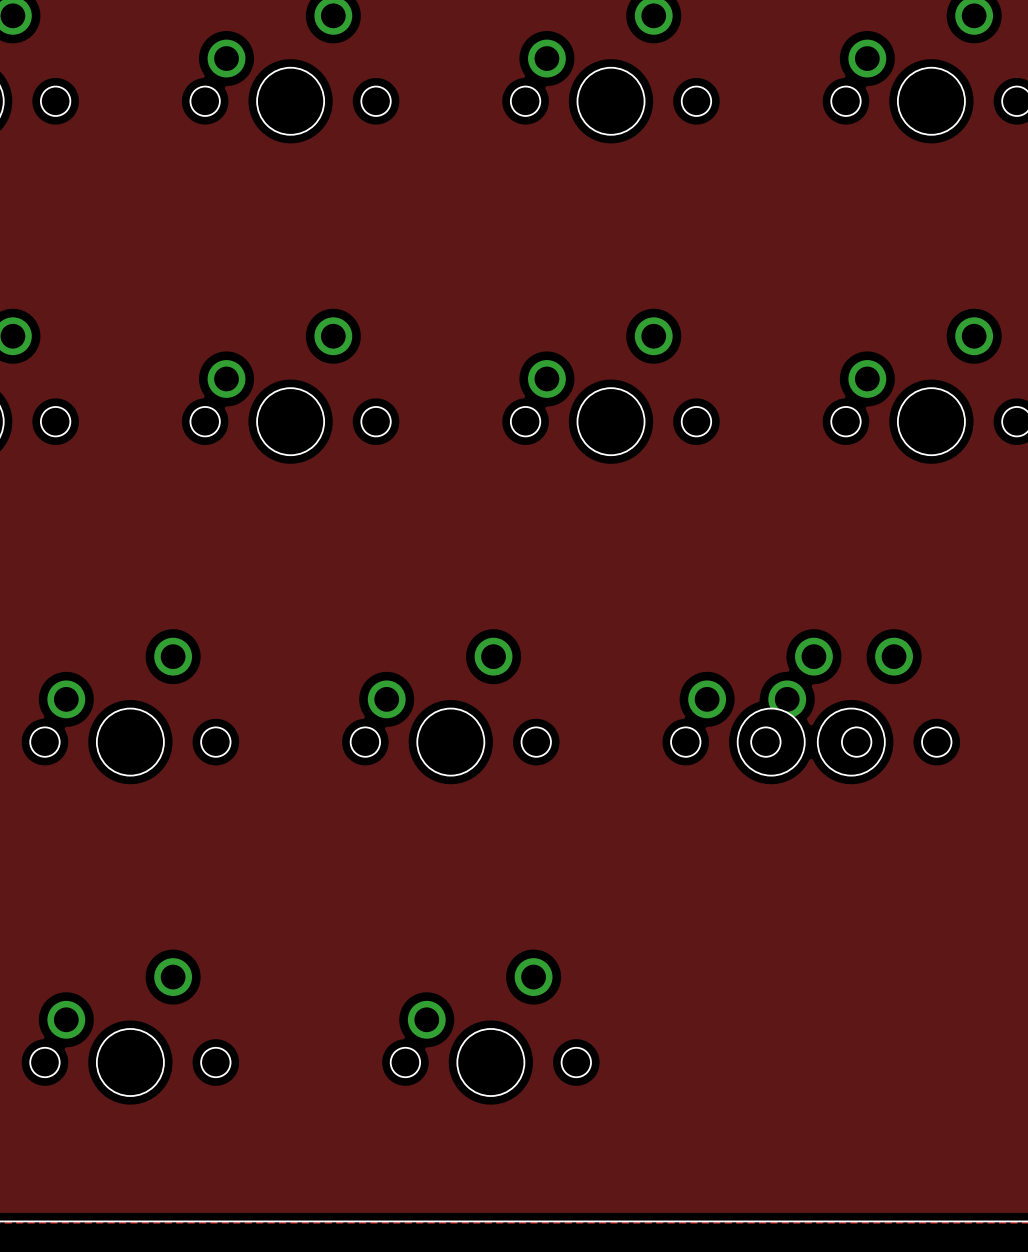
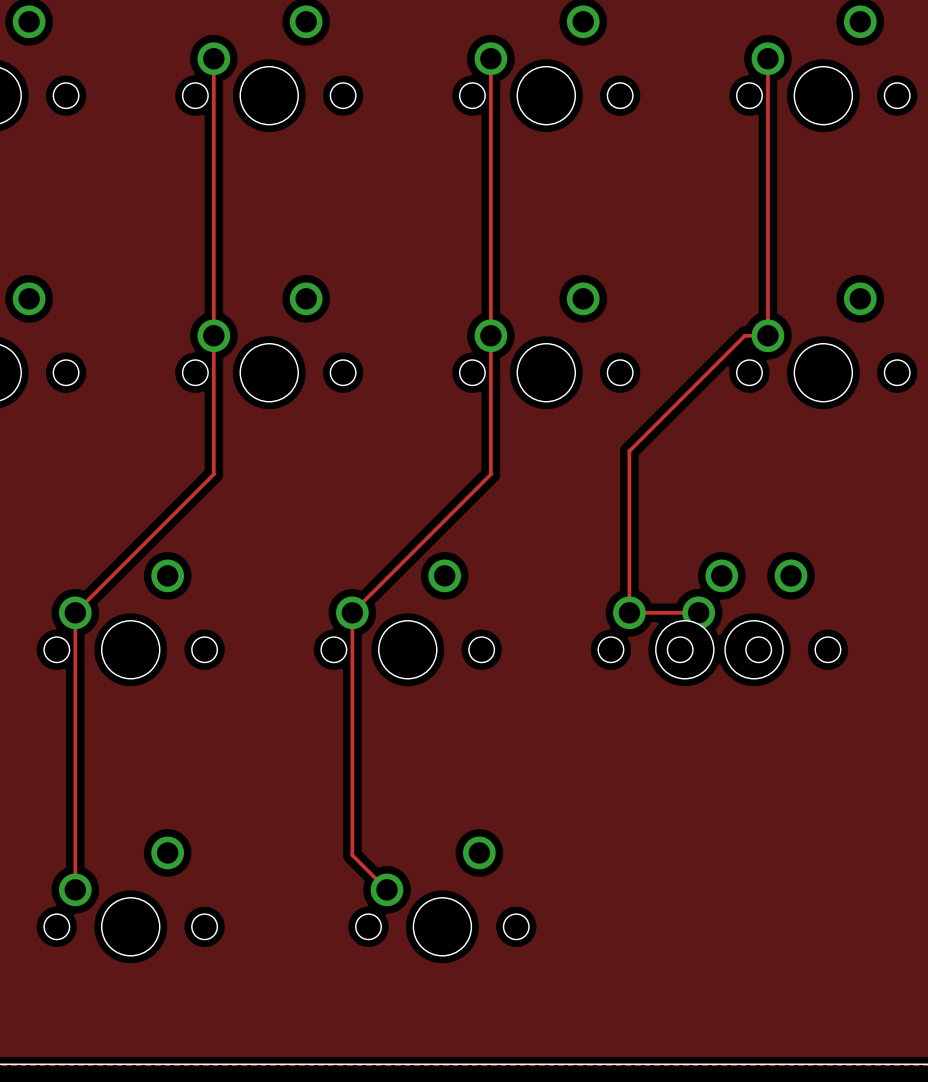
track: none -> (213, 58) (213, 474) (75, 612) (75, 889)
track: none -> (490, 58) (490, 474) (352, 612) (352, 855) (386, 889)
track: none -> (767, 58) (767, 335) (744, 335) (629, 451) (629, 612) (698, 612)

